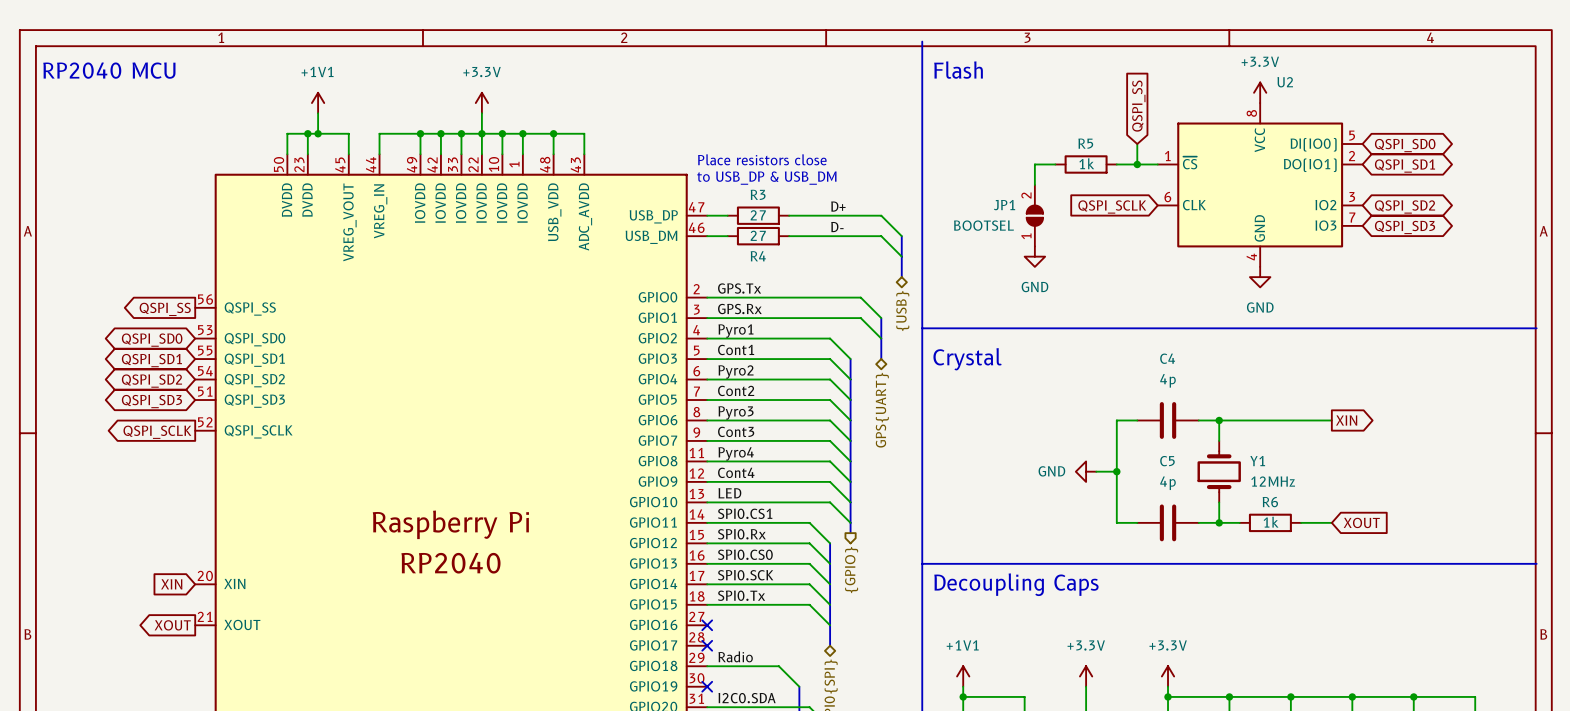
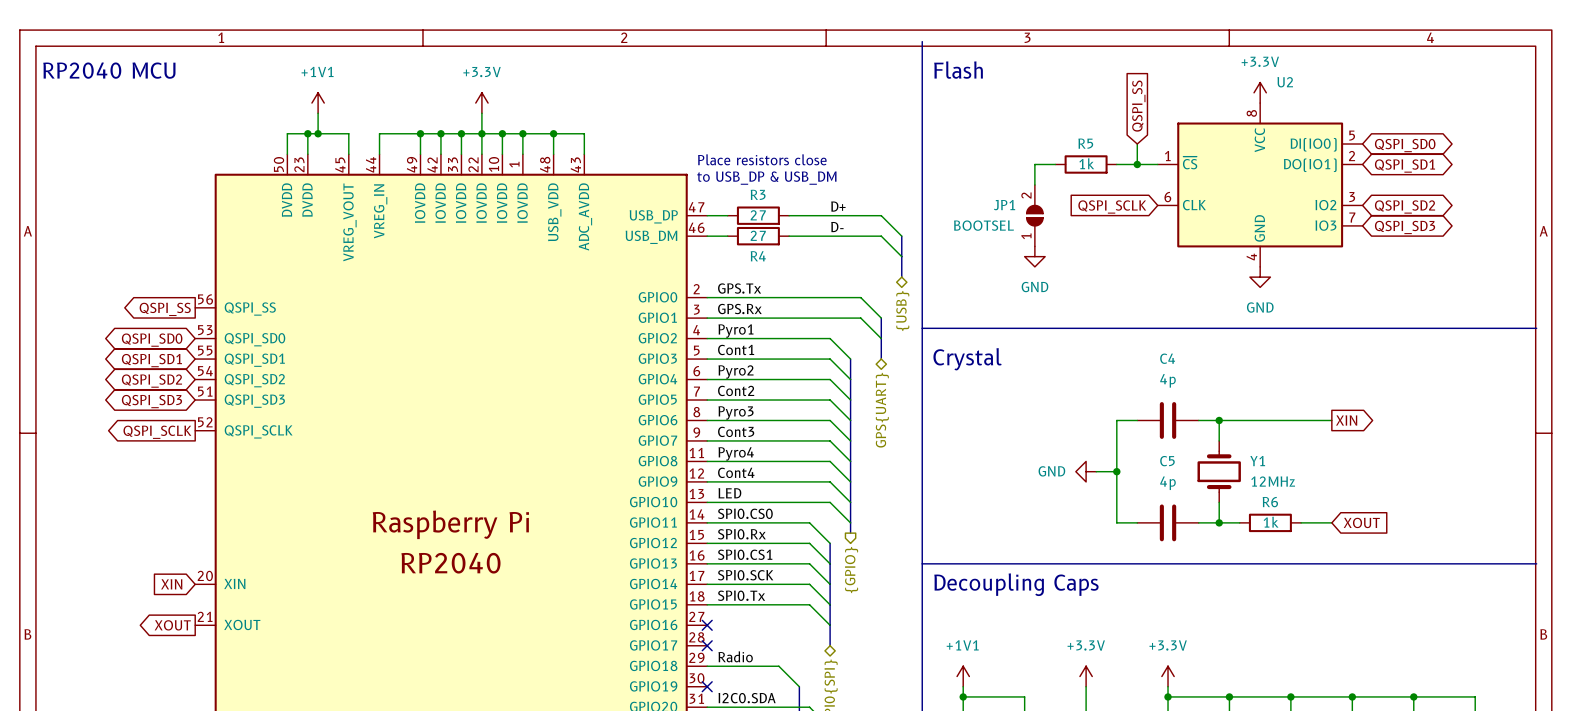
label: SPI0.CS1 (745, 513) -> SPI0.CS0 (745, 513)
label: SPI0.CS0 (745, 554) -> SPI0.CS1 (745, 554)

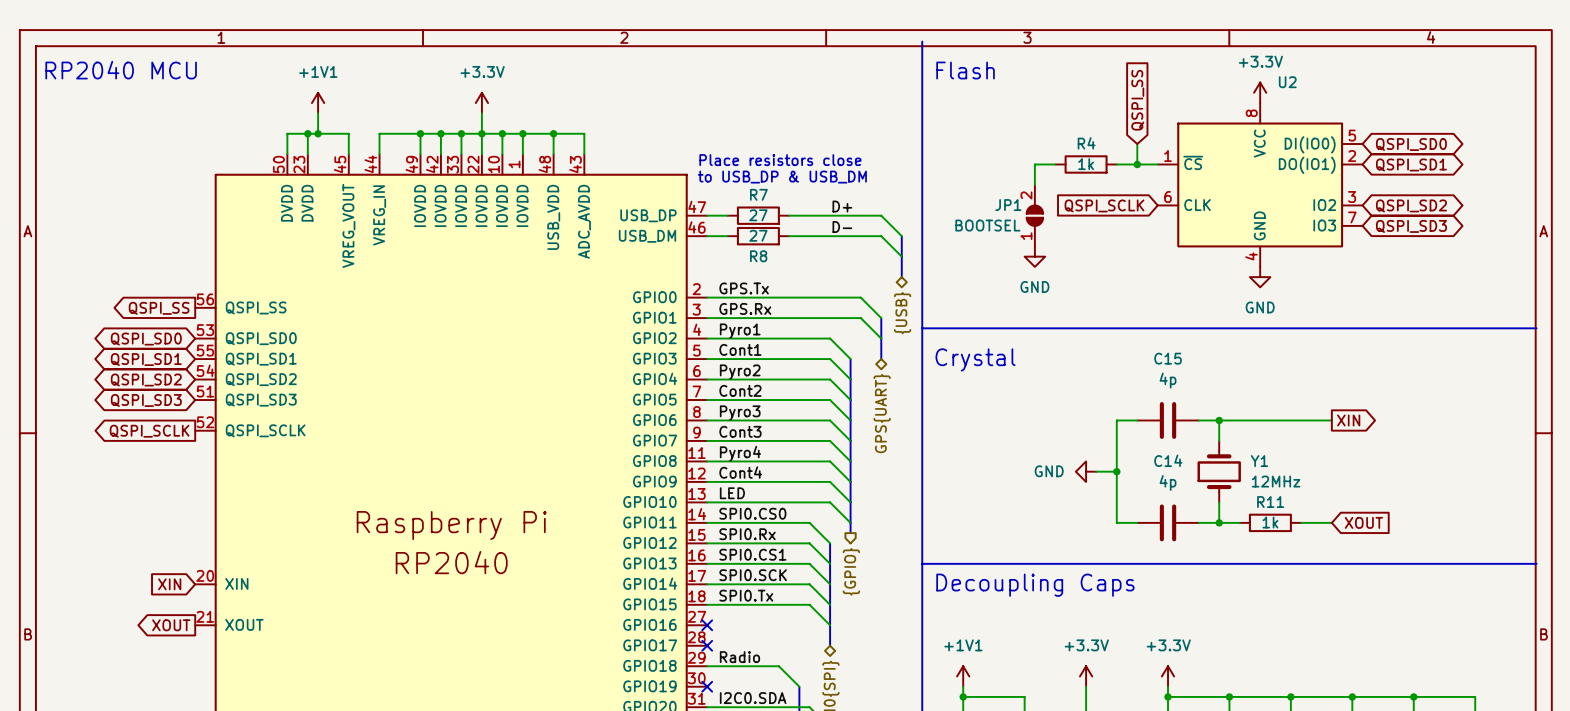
R5 name: R5 (1085, 143) -> R4 (1086, 143)
R3 name: R3 (758, 194) -> R7 (758, 194)
R4 name: R4 (758, 256) -> R8 (758, 256)
C4 name: C4 (1167, 358) -> C15 (1168, 358)
C5 name: C5 (1167, 461) -> C14 (1168, 460)
R6 name: R6 (1270, 502) -> R11 (1270, 502)

